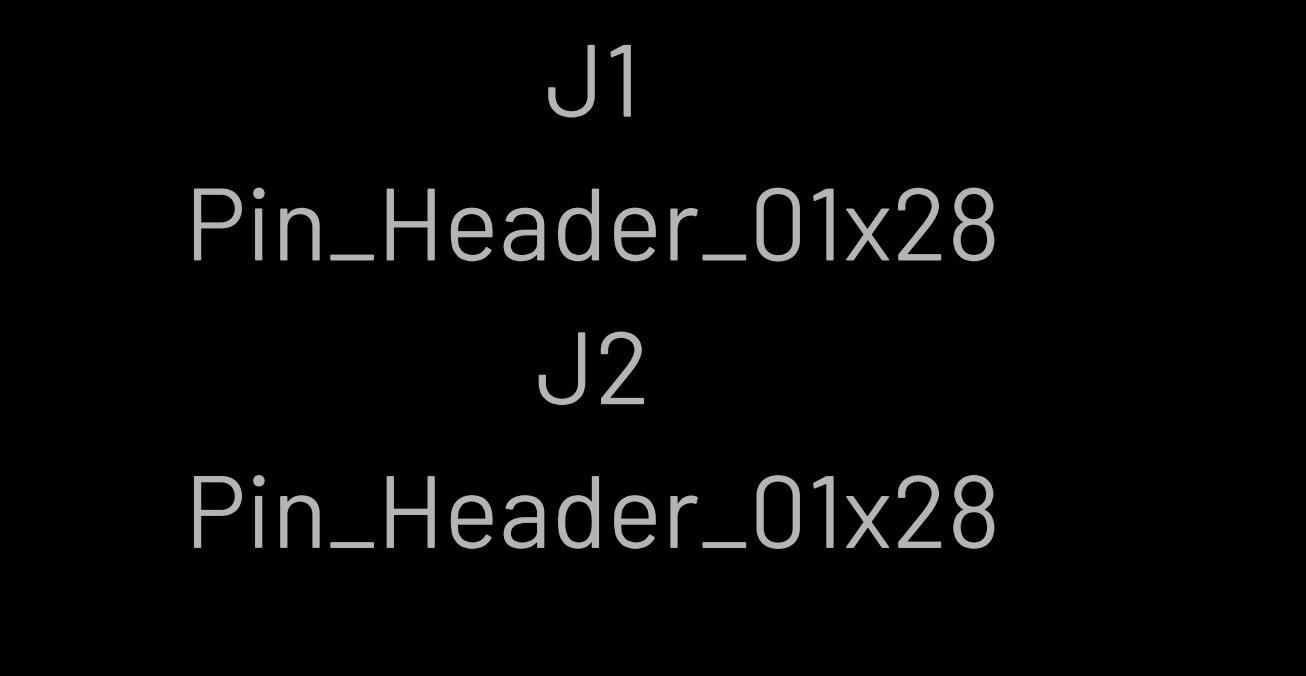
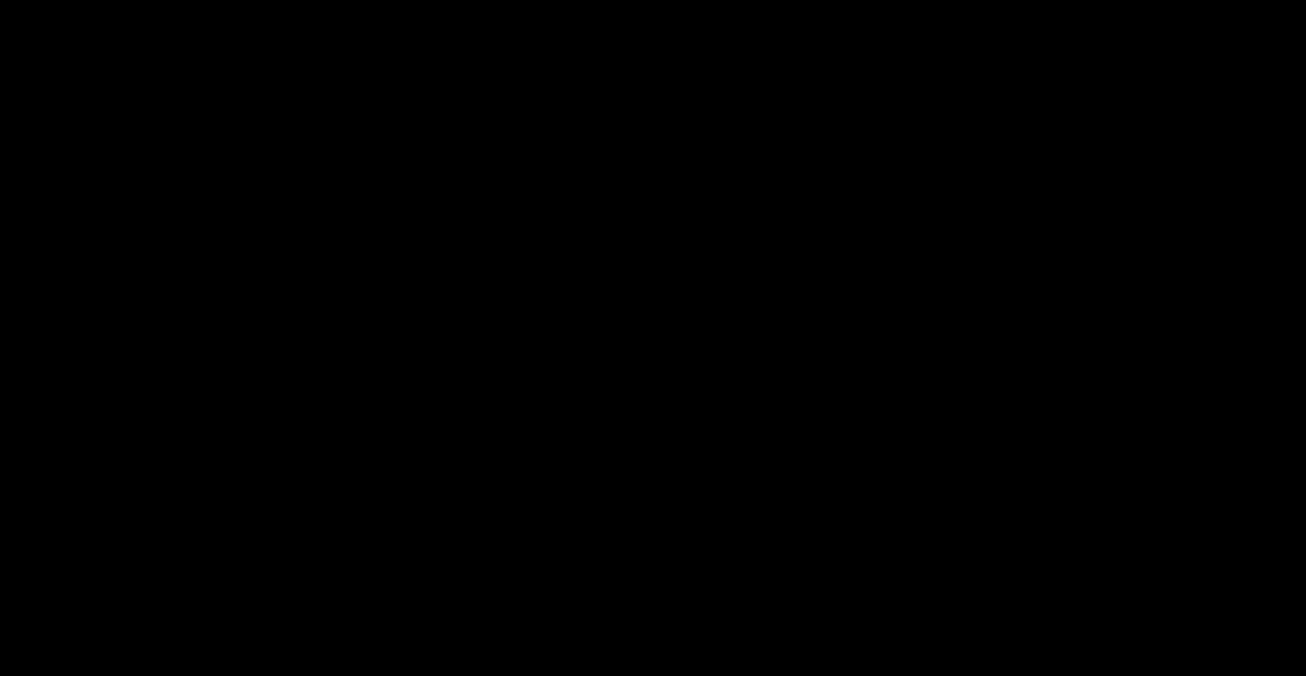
J1: Pin_Header_01x28 (594, 153) -> none
J2: Pin_Header_01x28 (594, 440) -> none

